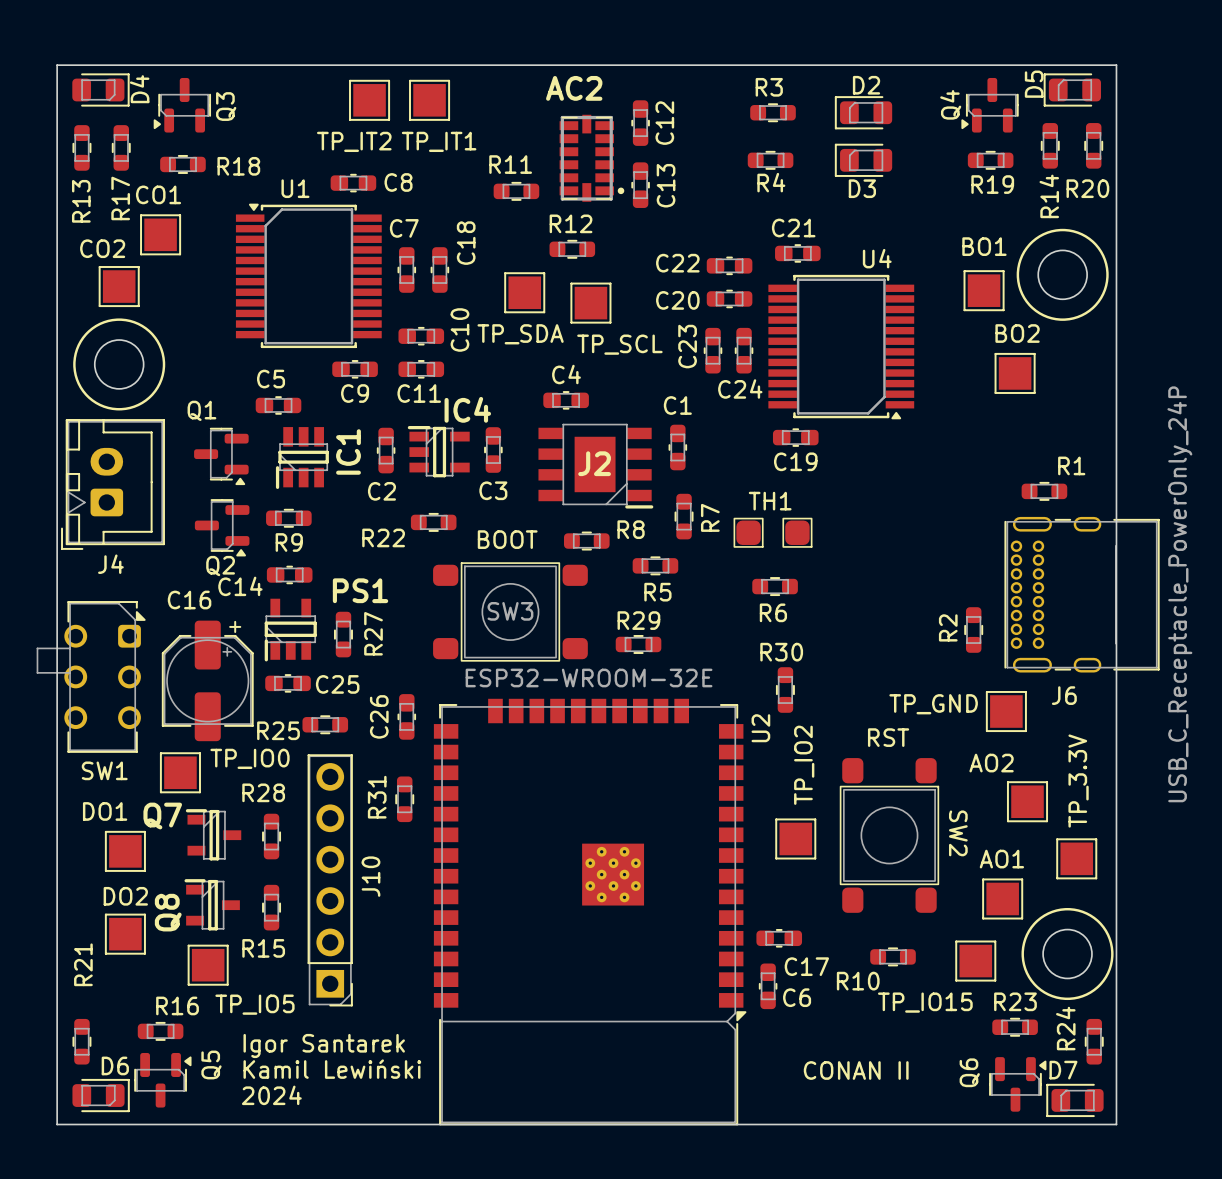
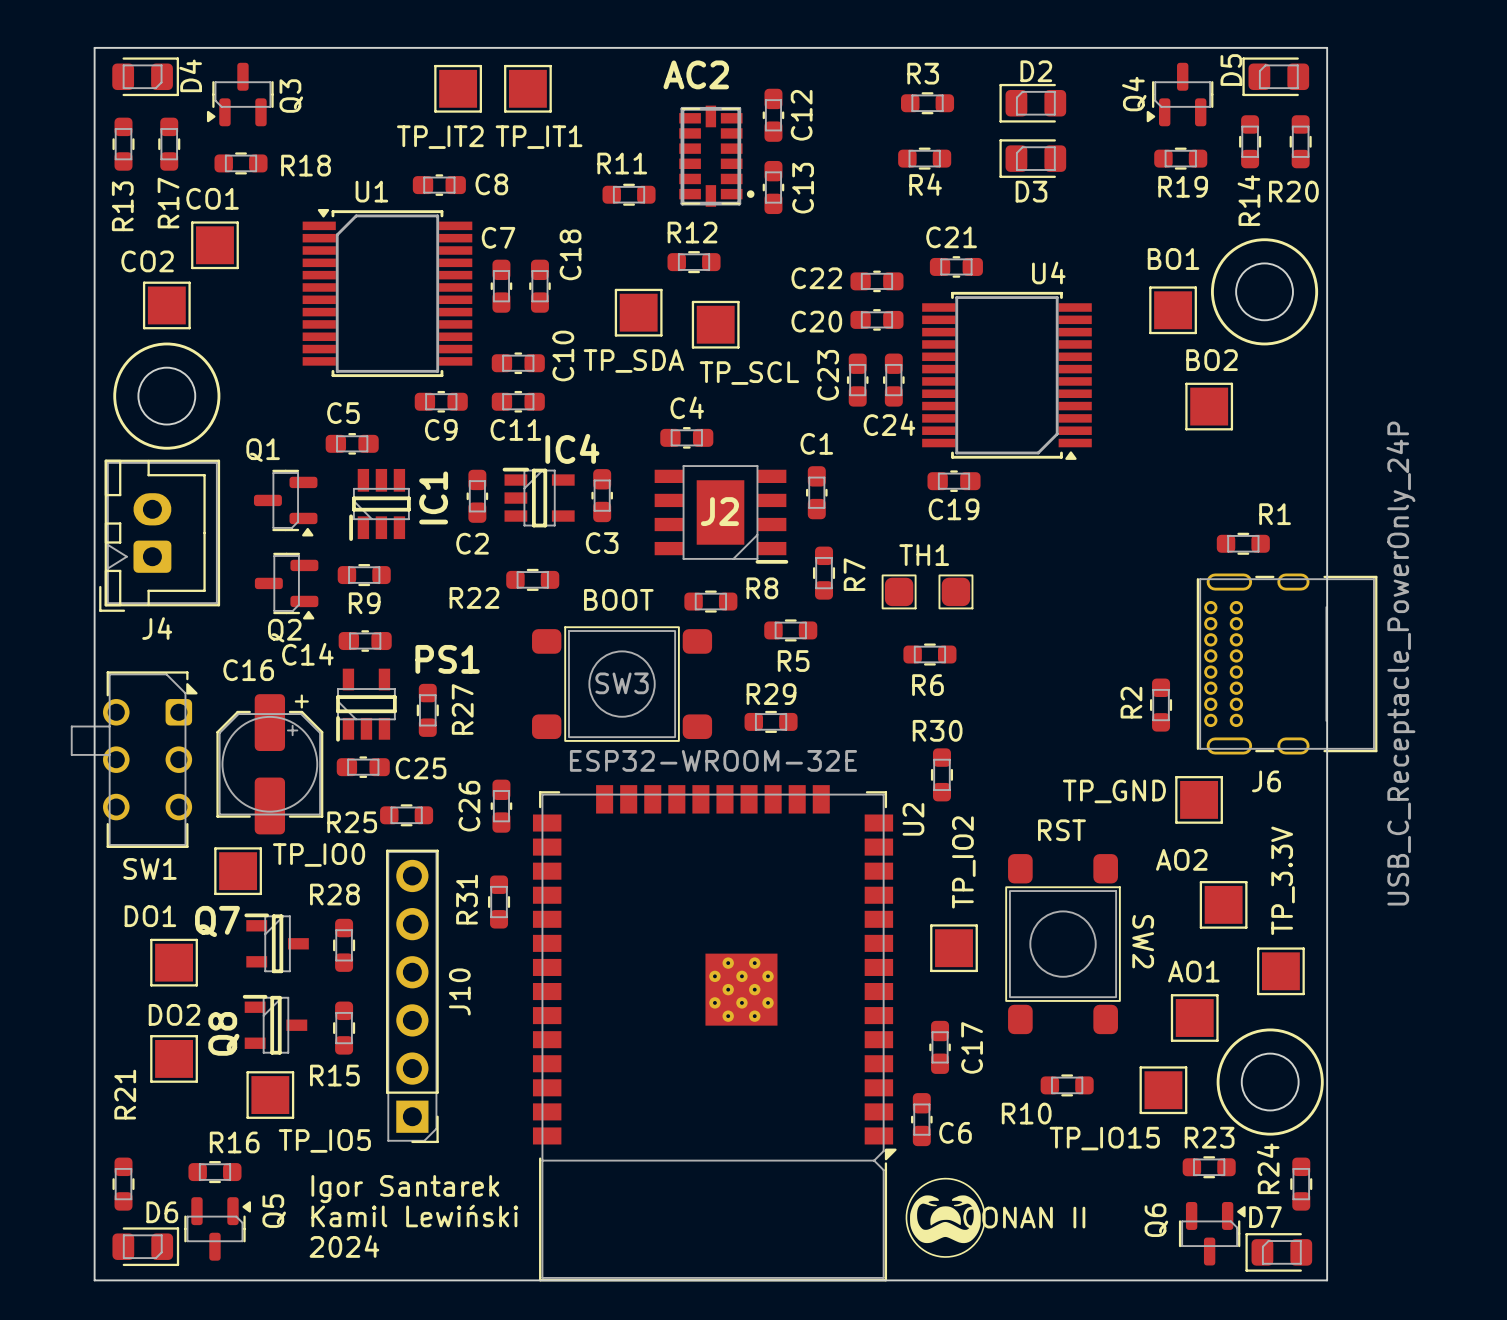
C17 rotation: 0° (779, 938) -> 90° clockwise (940, 1047)
drawing: none -> [905, 1177, 986, 1258]

